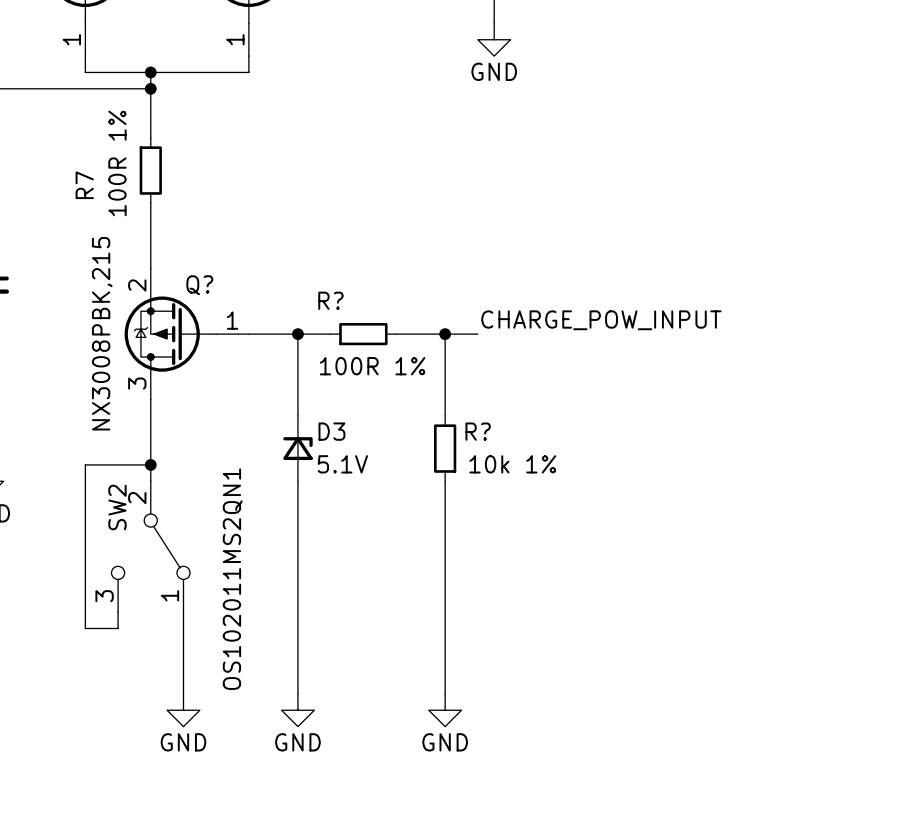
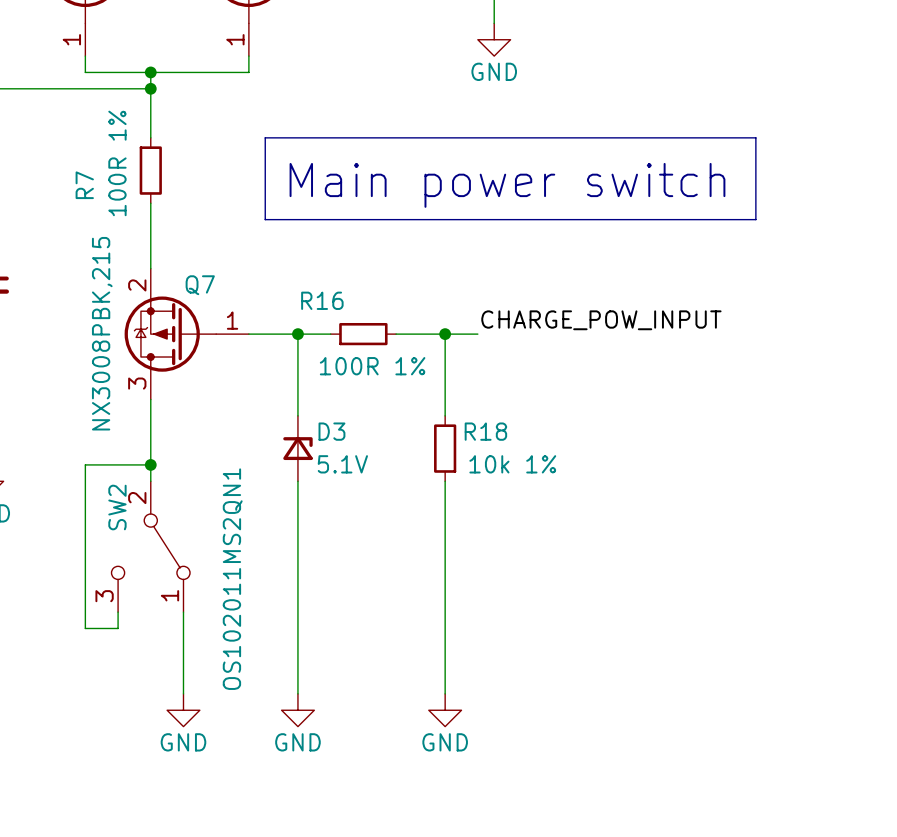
line: none -> (265, 137) (265, 219) (755, 219) (755, 137) (265, 137)
text: none -> Main power switch (507, 185)
Q? name: Q? (199, 285) -> Q7 (200, 285)
R? name: R? (330, 300) -> R16 (322, 300)
R? name: R? (478, 431) -> R18 (485, 431)

